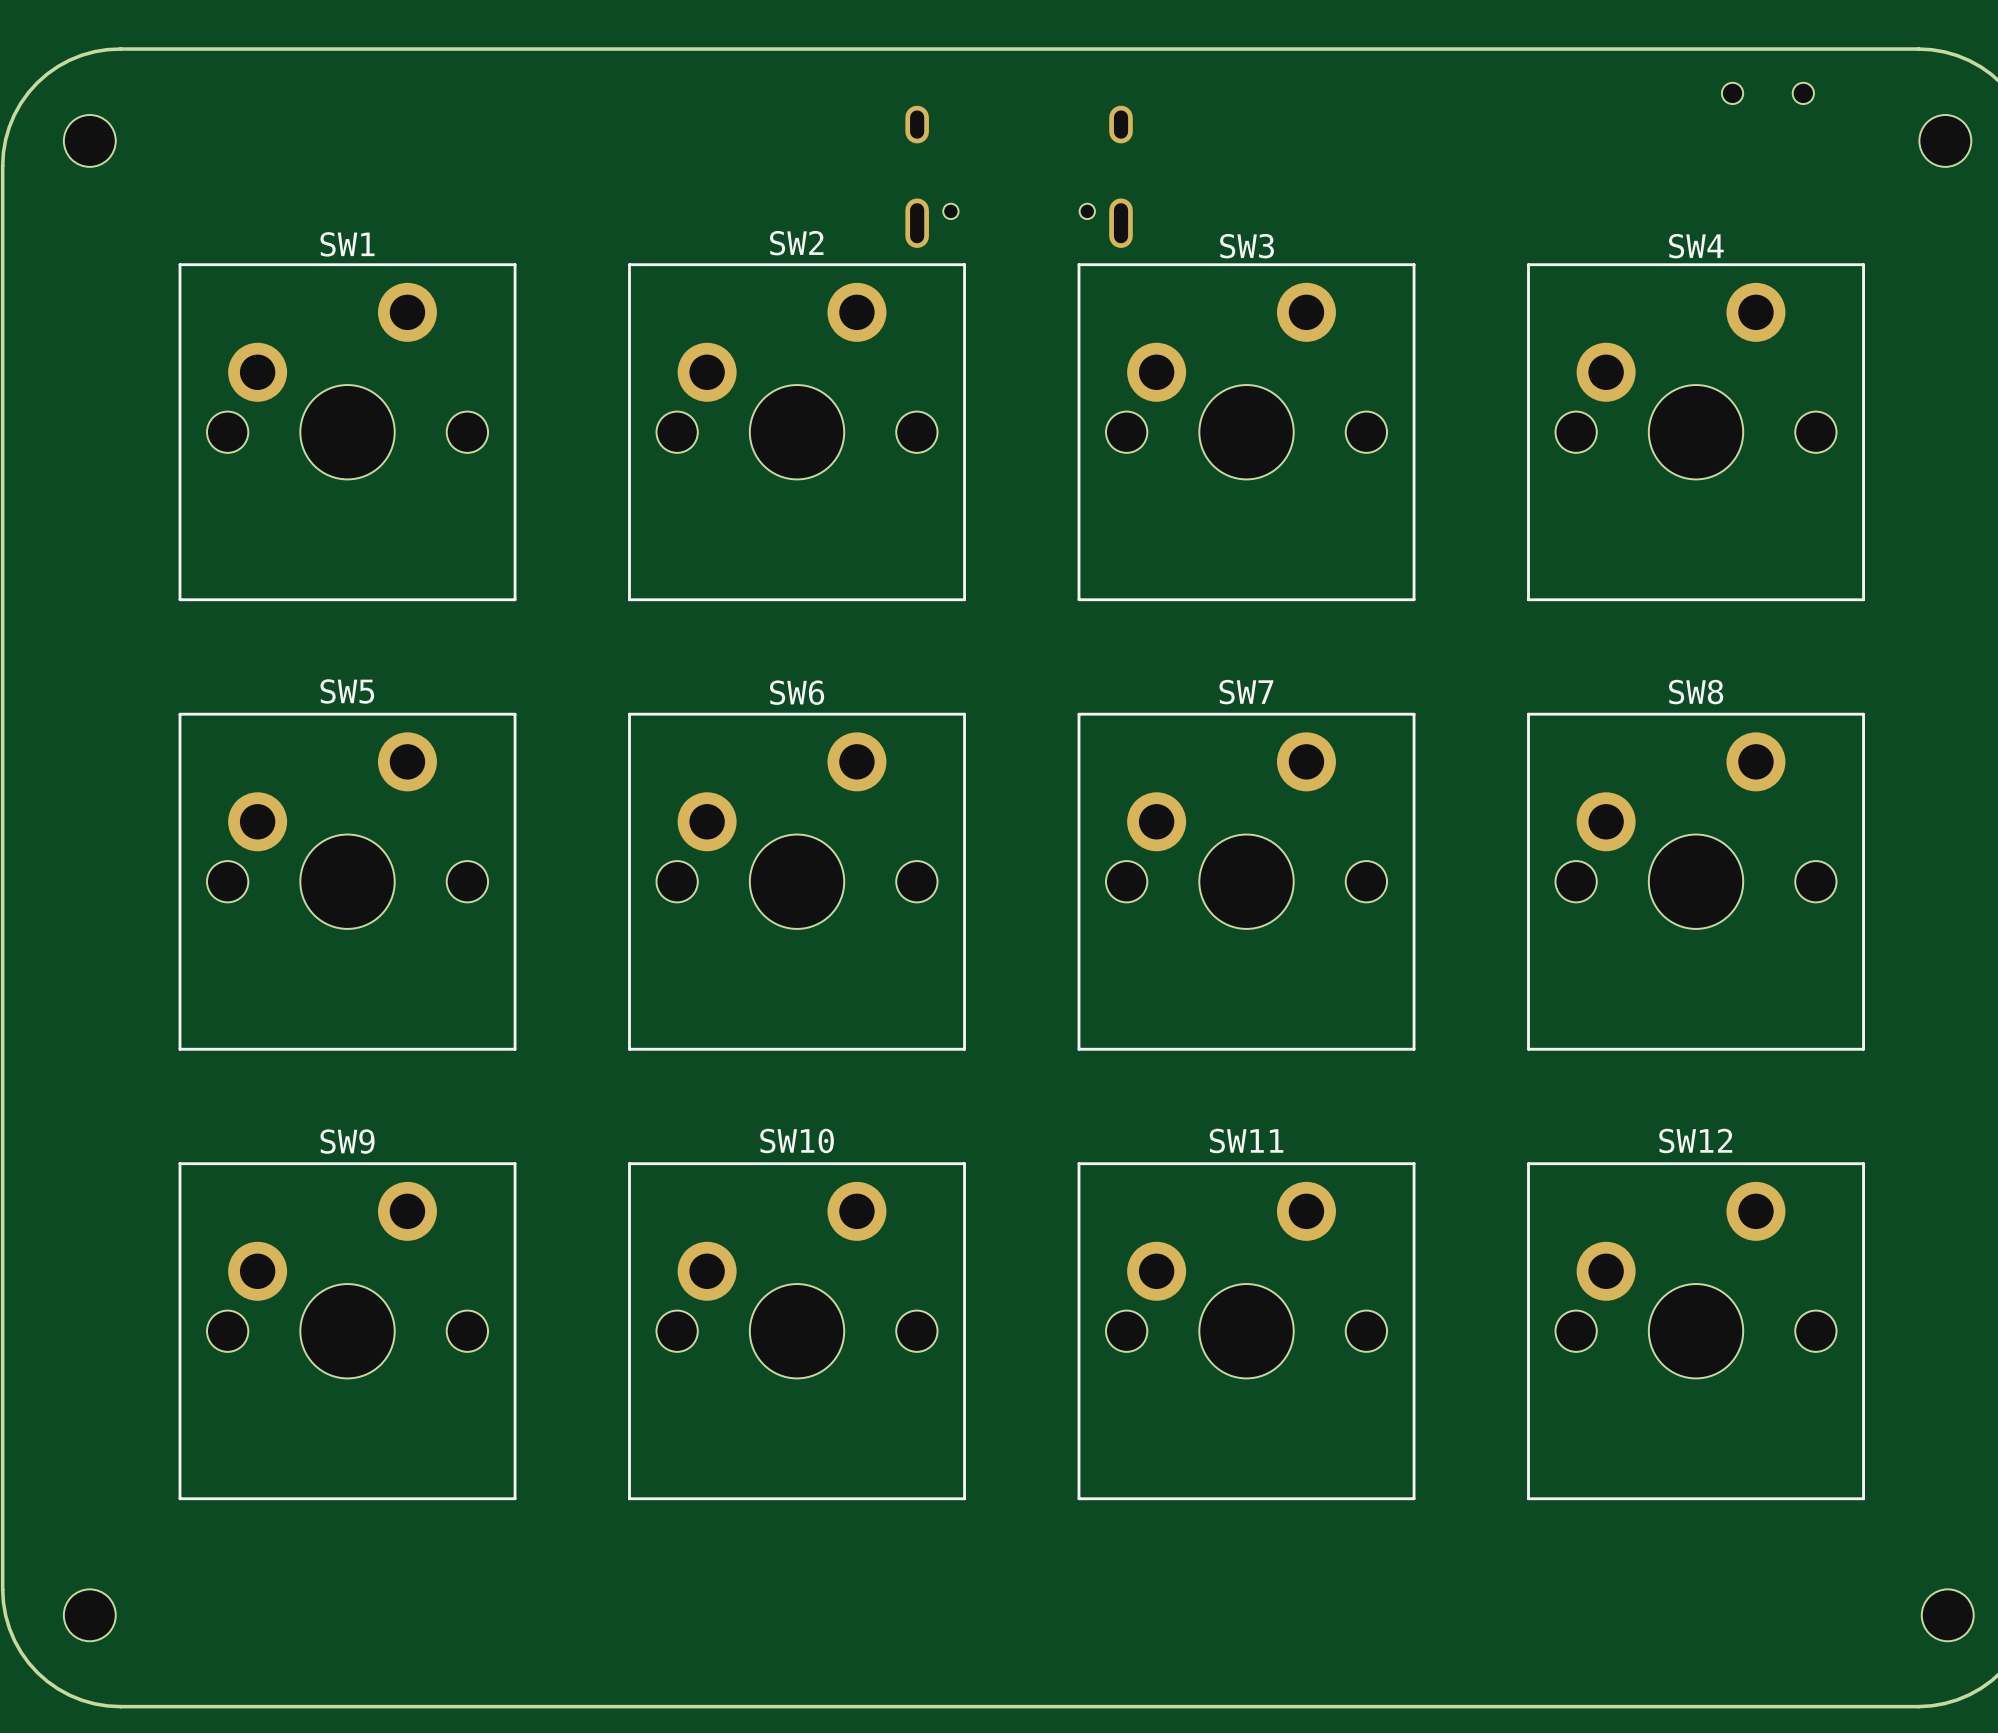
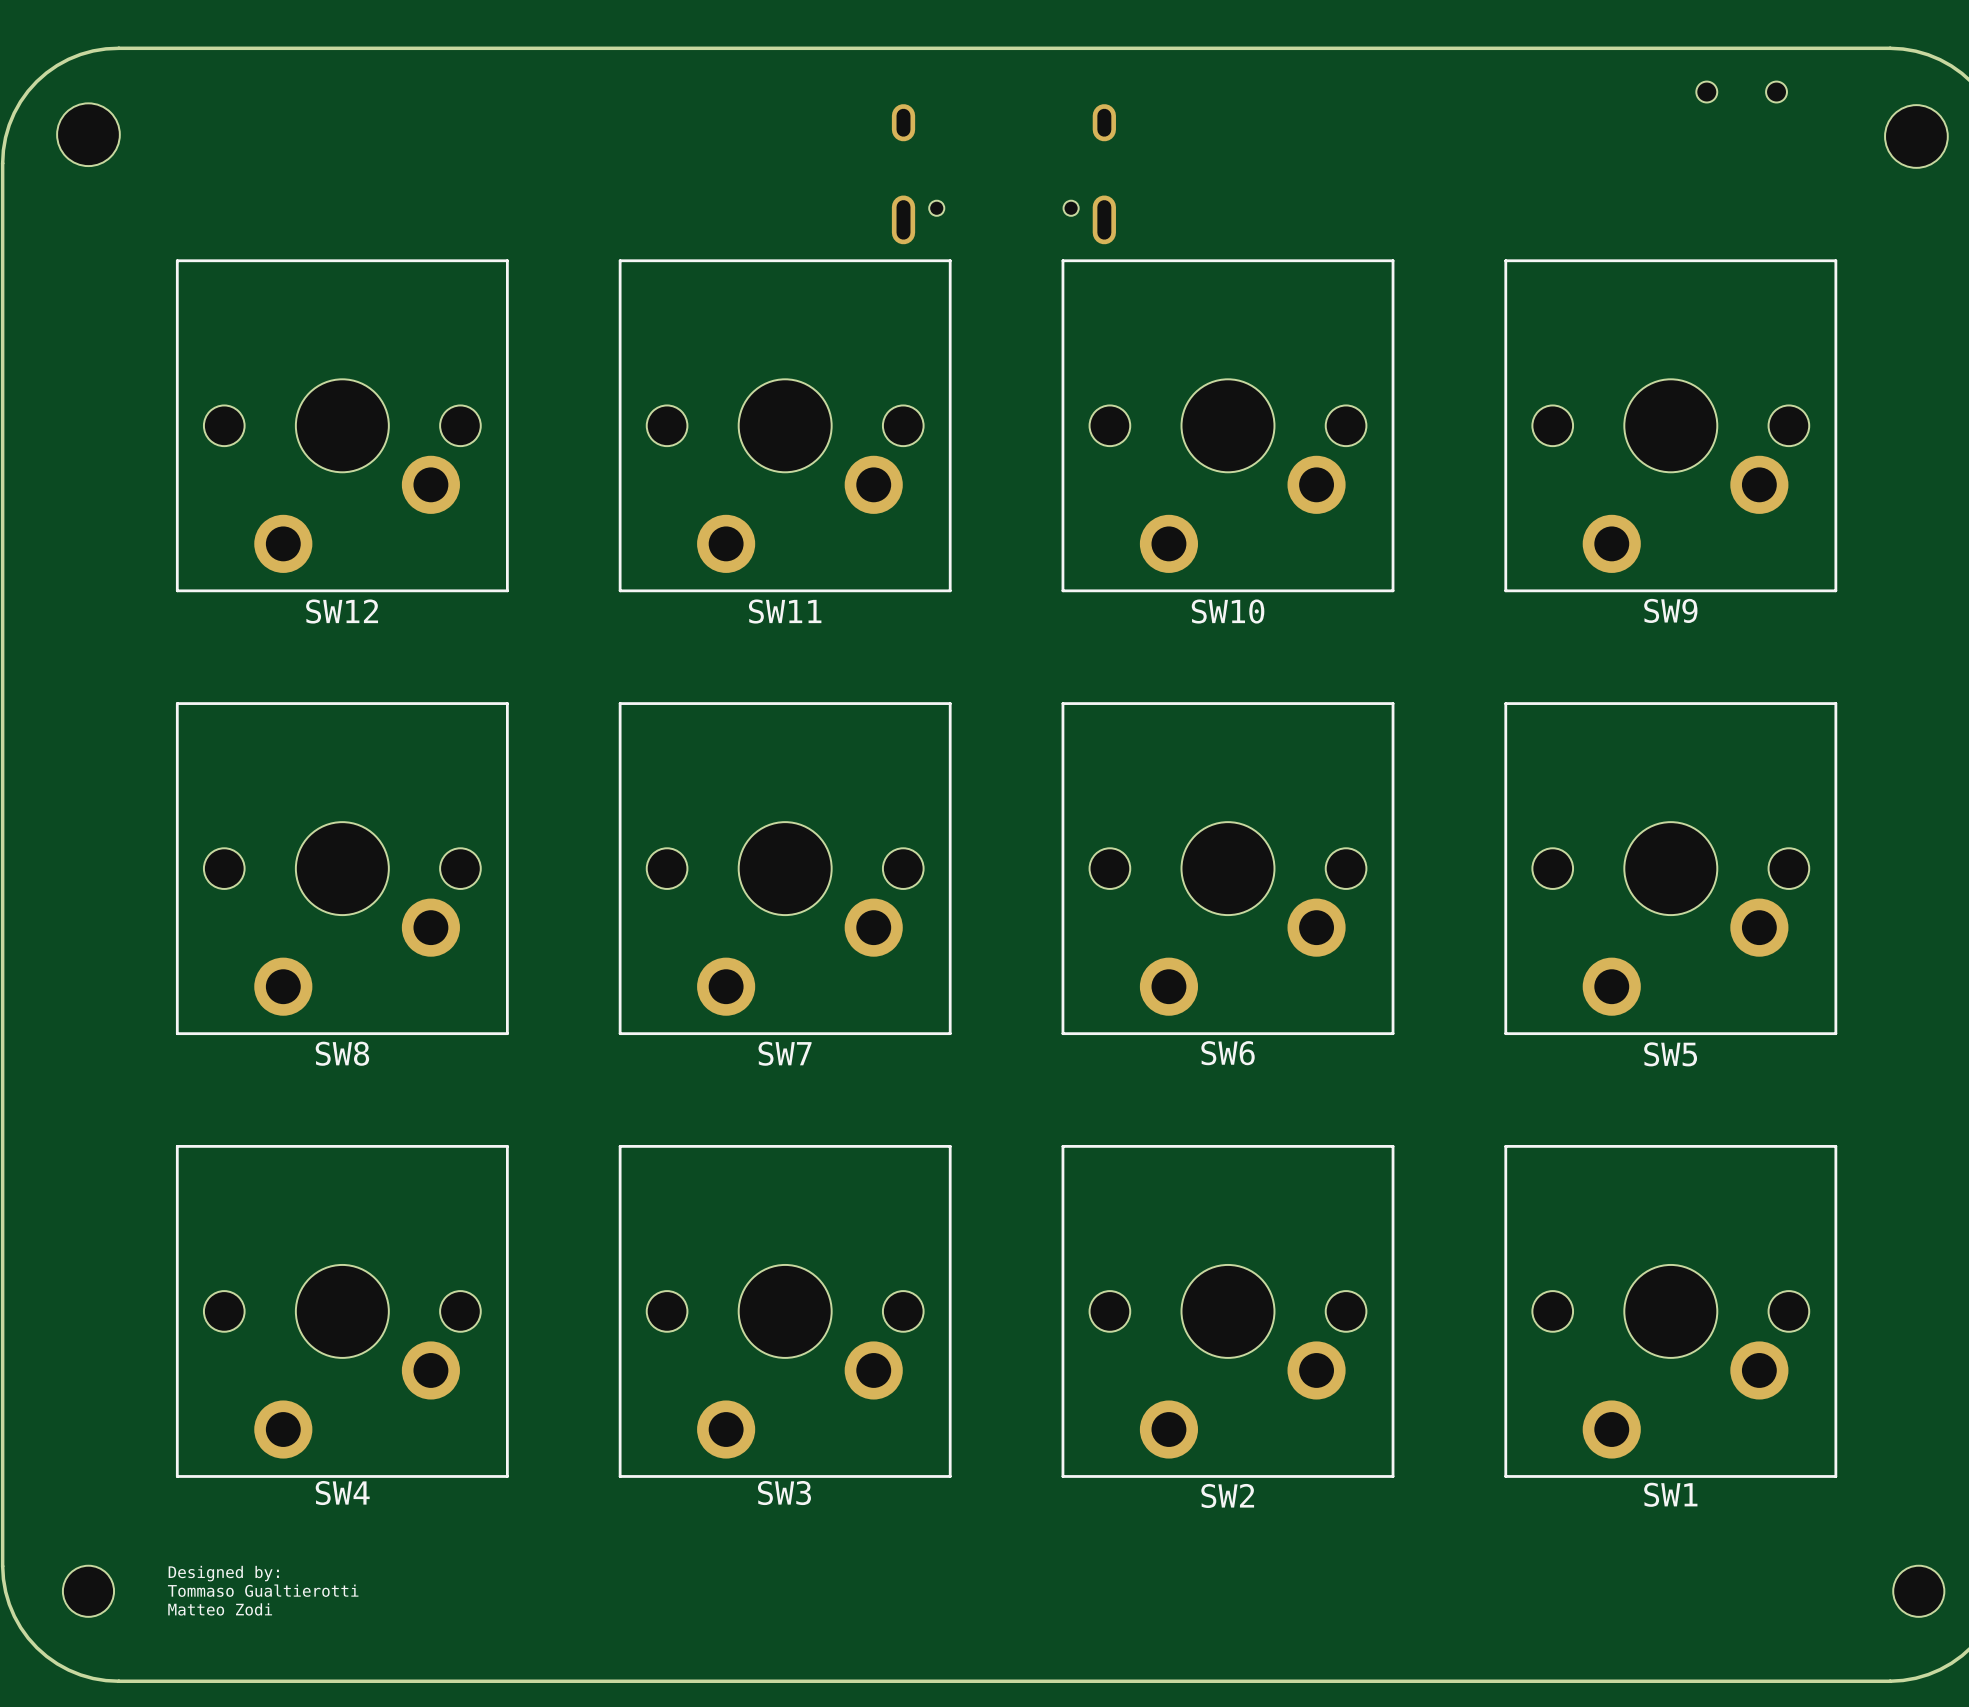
part footprint: [63, 114, 116, 167] -> [57, 103, 120, 167]
part footprint: [1919, 114, 1972, 167] -> [1885, 105, 1948, 168]
SW1 rotation: 0° (347, 432) -> 180° (1670, 1311)
SW1 position: (347, 432) -> (1670, 1311)
SW2 rotation: 0° (797, 432) -> 180° (1227, 1311)
SW2 position: (797, 432) -> (1227, 1311)
SW3 rotation: 0° (1246, 432) -> 180° (785, 1311)
SW3 position: (1246, 432) -> (785, 1311)
SW4 rotation: 0° (1696, 432) -> 180° (342, 1311)
SW4 position: (1696, 432) -> (342, 1311)
SW5 rotation: 0° (347, 881) -> 180° (1670, 868)
SW5 position: (347, 881) -> (1670, 868)
SW6 rotation: 0° (797, 881) -> 180° (1227, 868)
SW6 position: (797, 881) -> (1227, 868)
SW7 rotation: 0° (1246, 881) -> 180° (785, 868)
SW7 position: (1246, 881) -> (785, 868)
SW8 rotation: 0° (1696, 881) -> 180° (342, 868)
SW8 position: (1696, 881) -> (342, 868)
SW9 rotation: 0° (347, 1331) -> 180° (1670, 425)
SW9 position: (347, 1331) -> (1670, 425)
SW10 rotation: 0° (797, 1331) -> 180° (1227, 425)
SW10 position: (797, 1331) -> (1227, 425)
SW11 rotation: 0° (1246, 1331) -> 180° (785, 425)
SW11 position: (1246, 1331) -> (785, 425)
SW12 rotation: 0° (1696, 1331) -> 180° (342, 425)
SW12 position: (1696, 1331) -> (342, 425)
text: none -> Designed by: (223, 1573)
text: none -> Tommaso Gualtierotti (263, 1590)
text: none -> Matteo Zodi (220, 1609)

